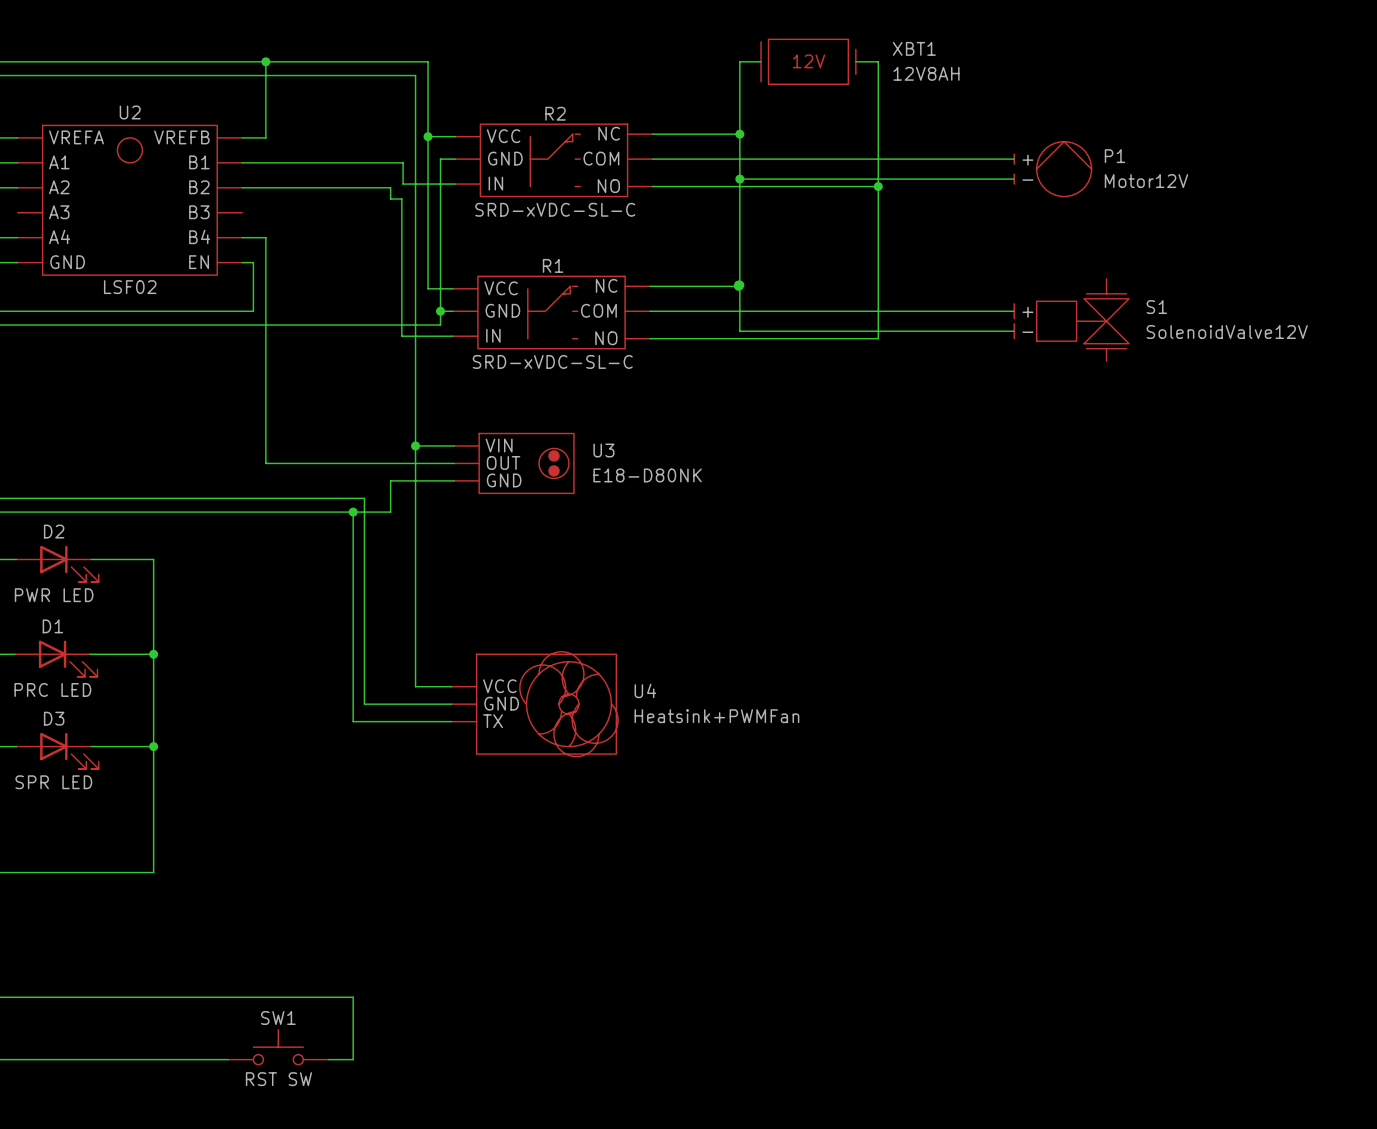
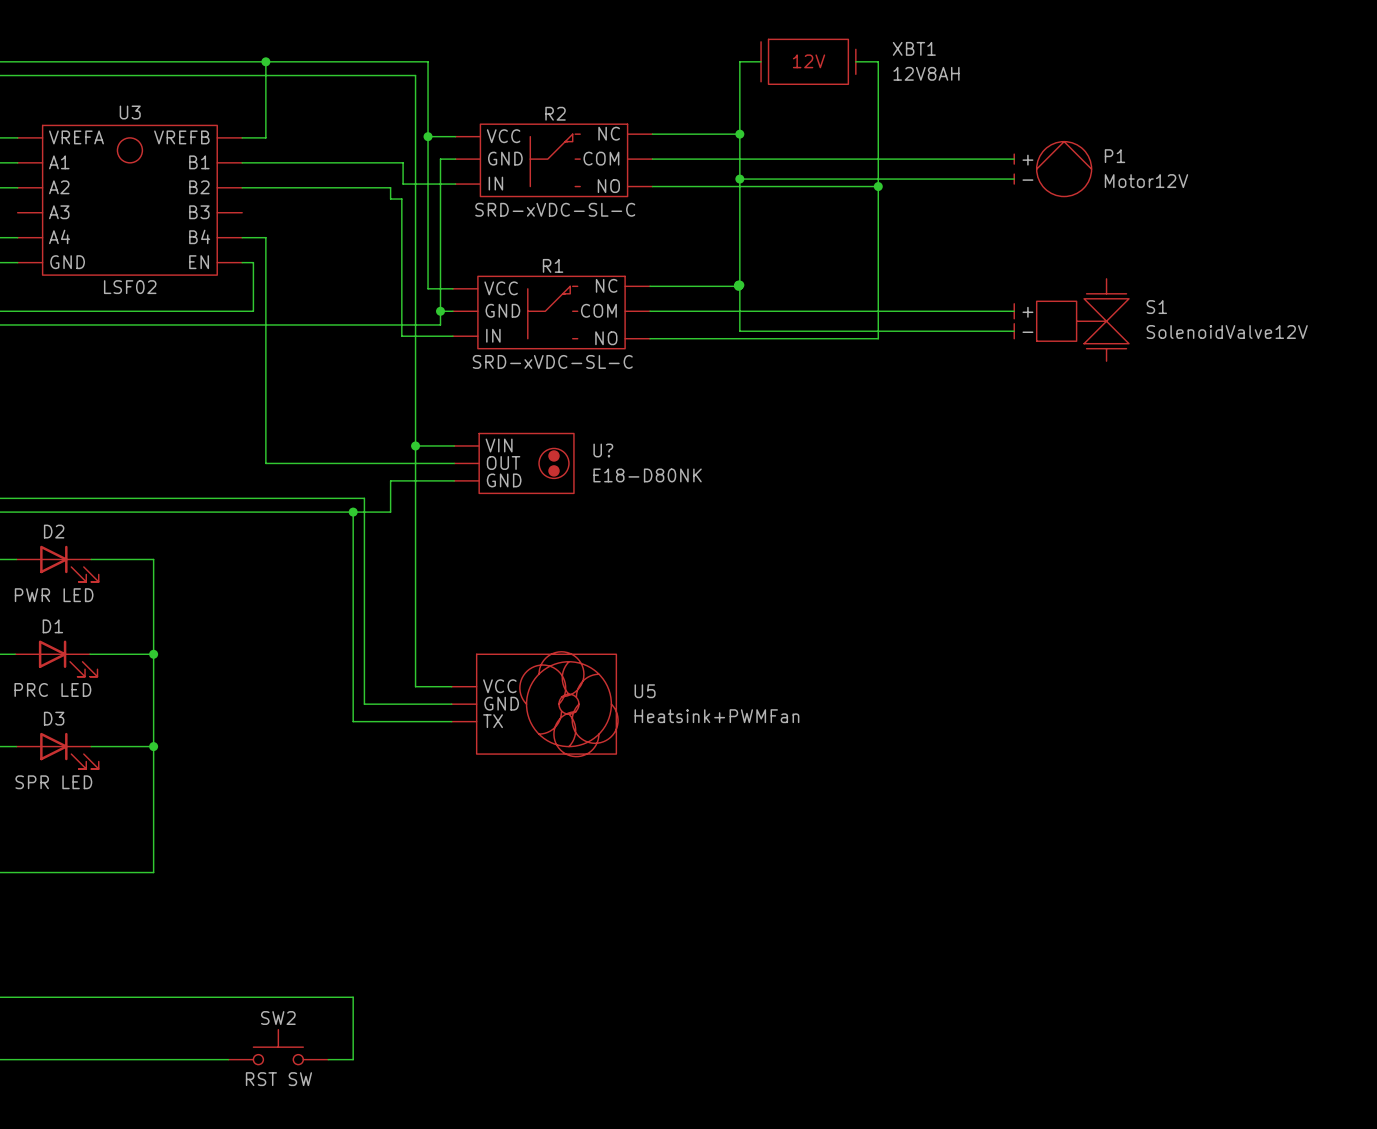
U2 name: U2 (130, 112) -> U3 (130, 112)
U3 name: U3 (603, 450) -> U? (603, 450)
U4 name: U4 (645, 690) -> U5 (645, 691)
SW1 name: SW1 (278, 1018) -> SW2 (278, 1018)

